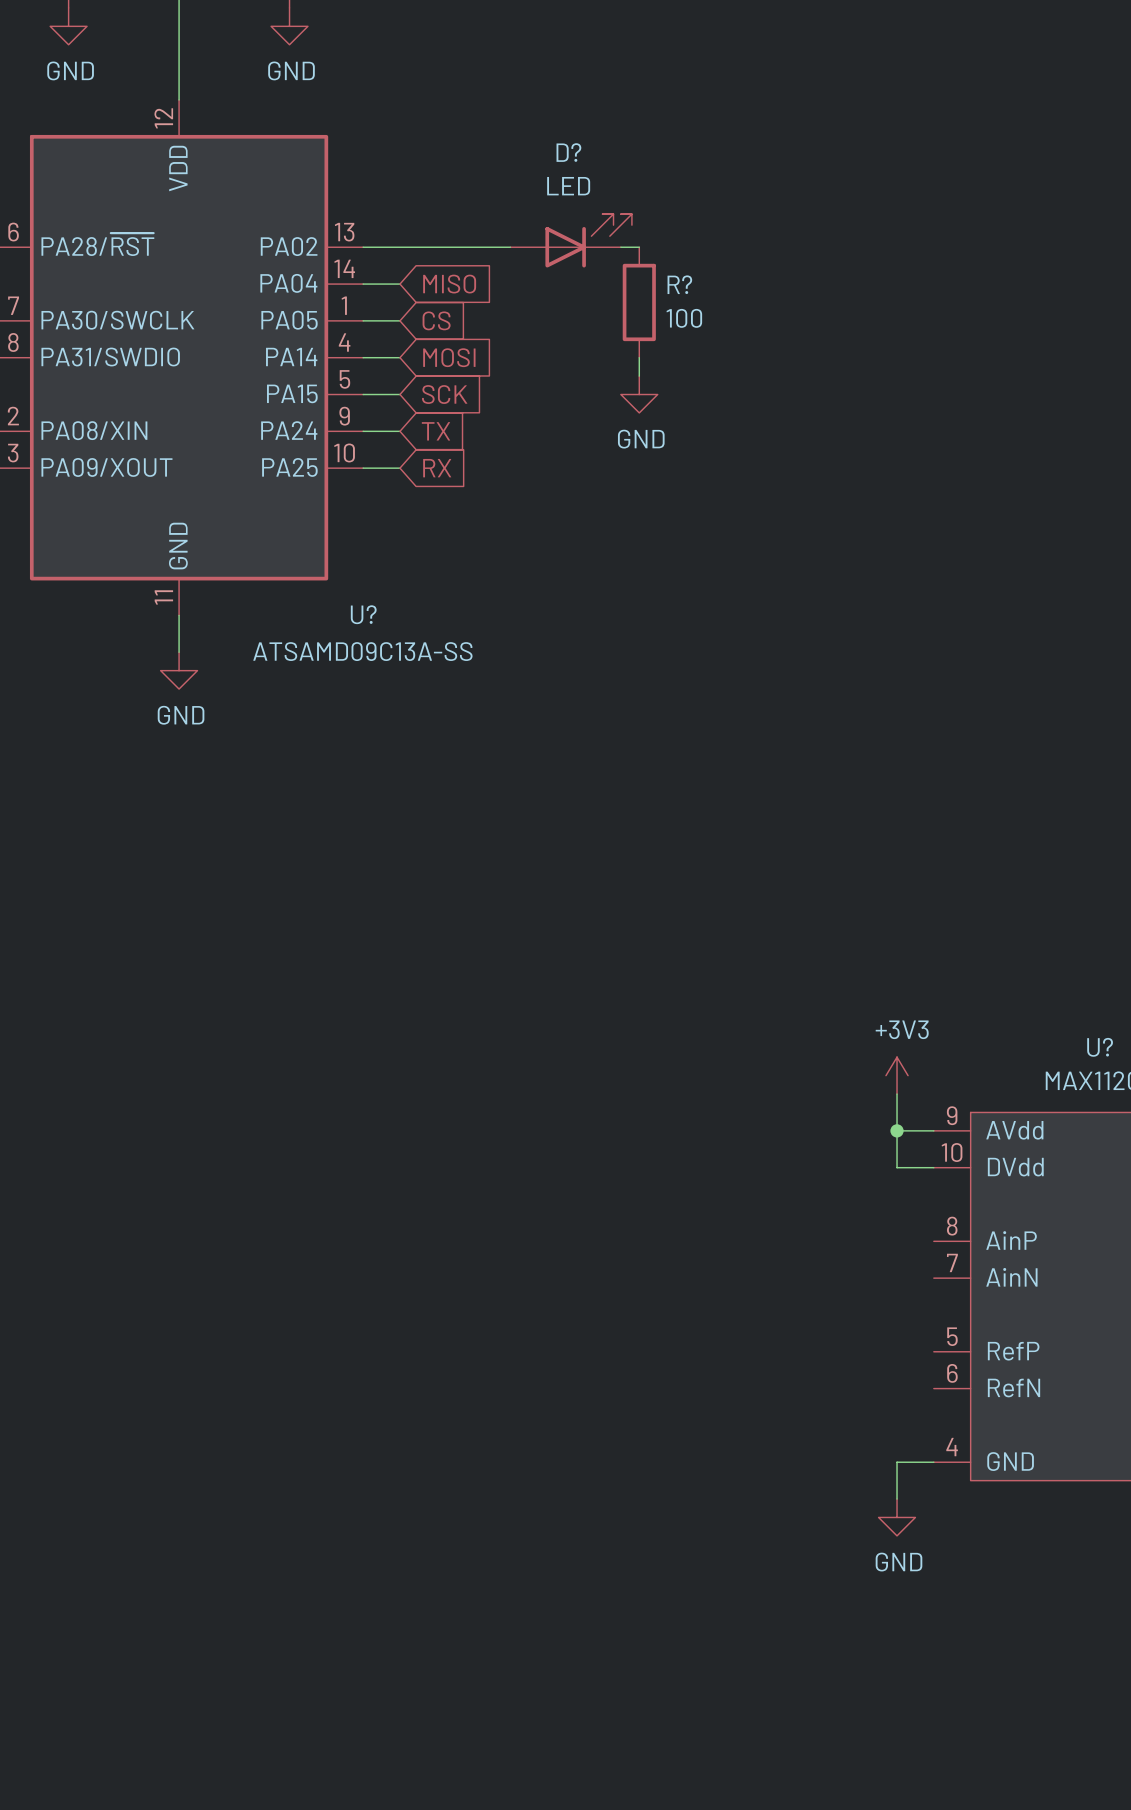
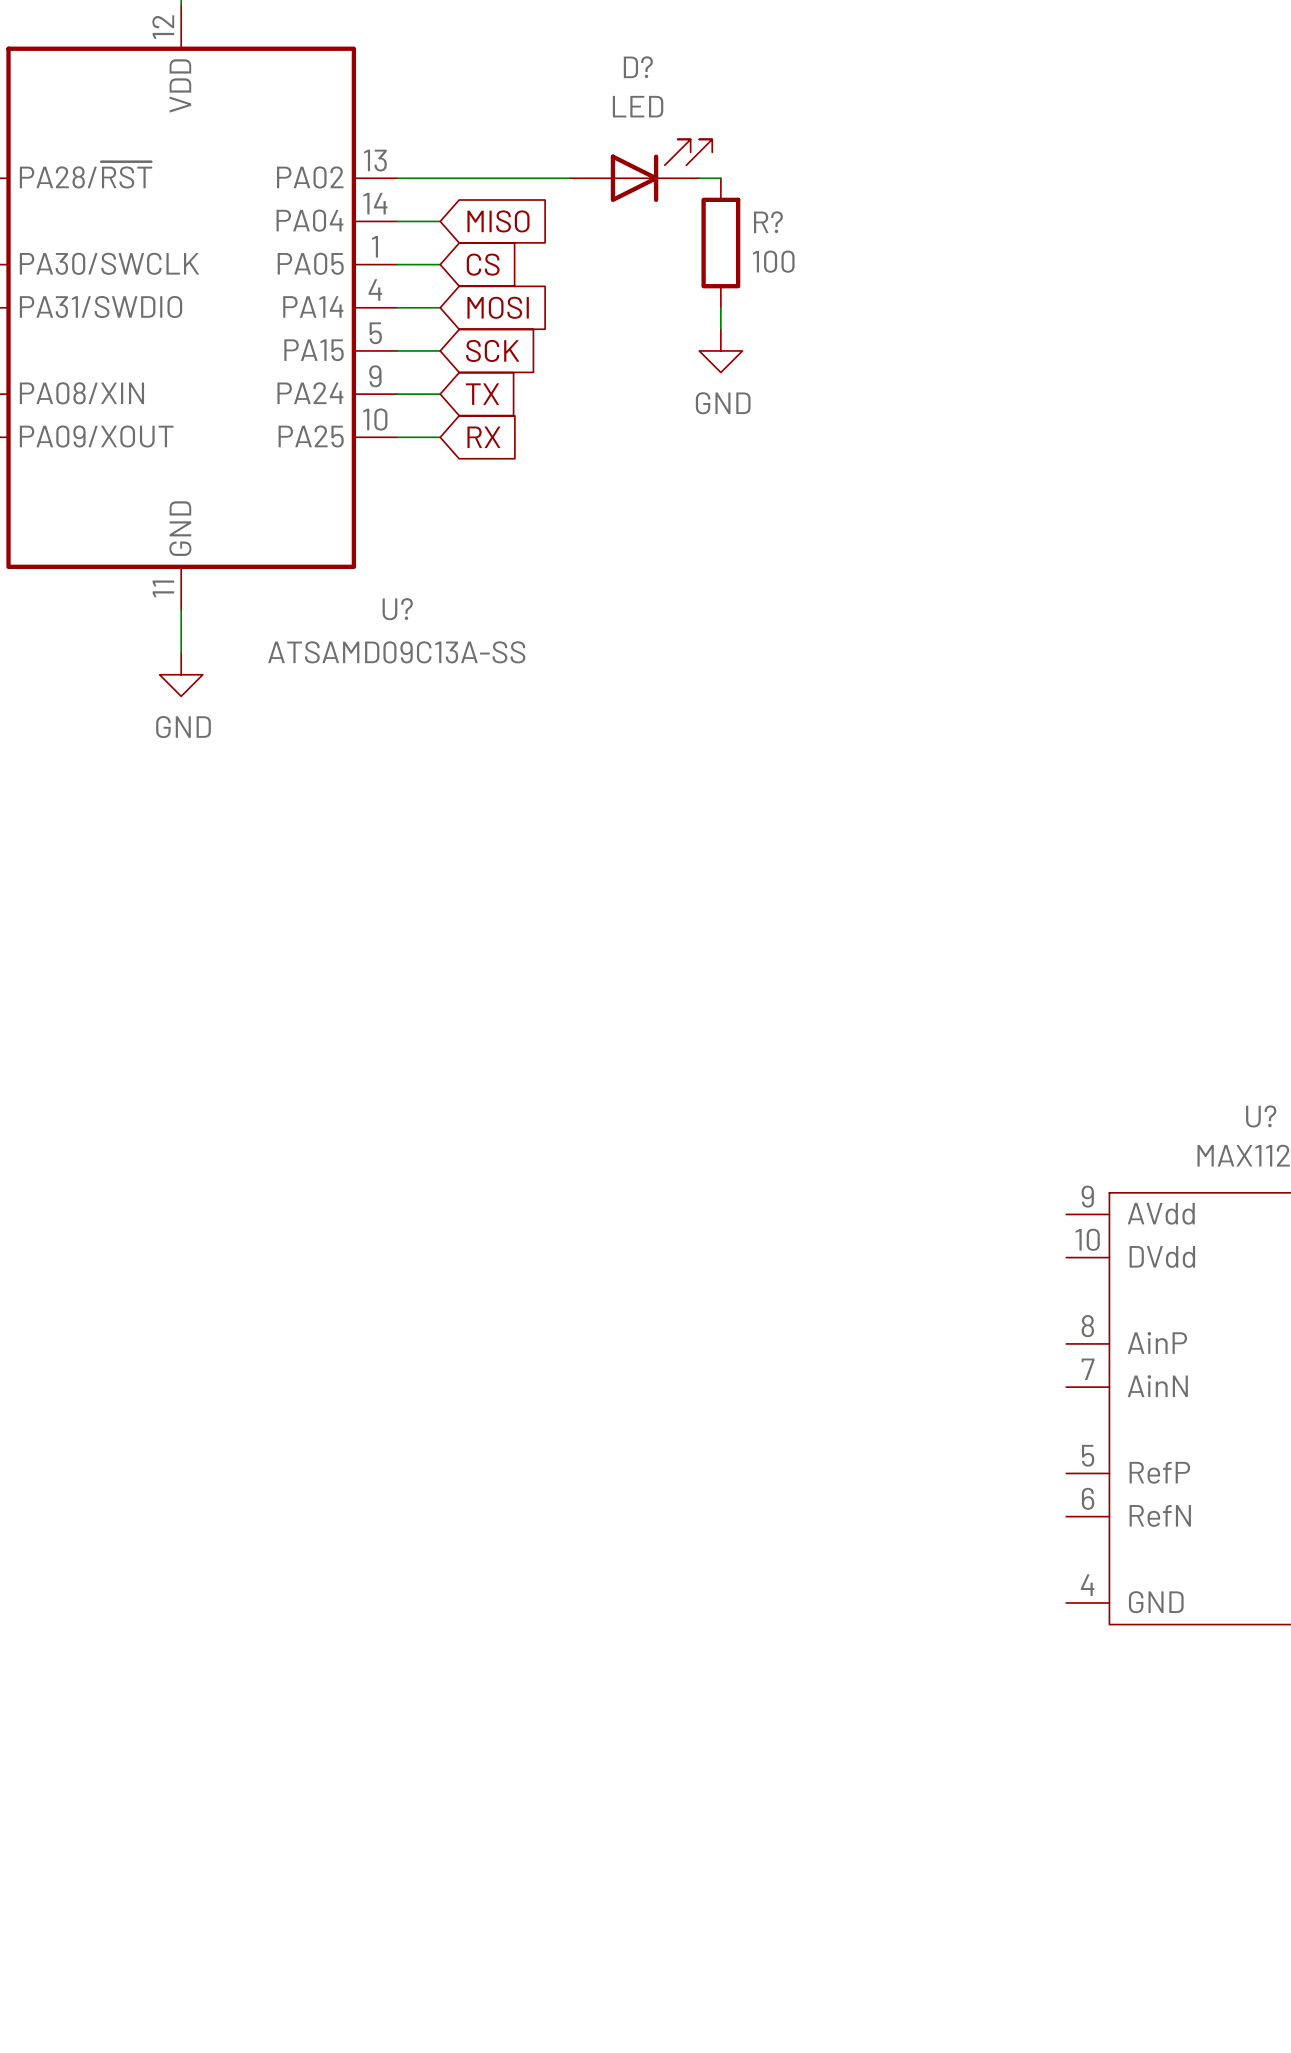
power symbol: +3V3 (897, 1075) -> none
wire: (897, 1094) (897, 1167) (933, 1167) -> none
wire: (897, 1130) (933, 1130) -> none
junction: (897, 1130) -> none
wire: (933, 1462) (897, 1462) (897, 1499) -> none
power symbol: GND (897, 1517) -> none

